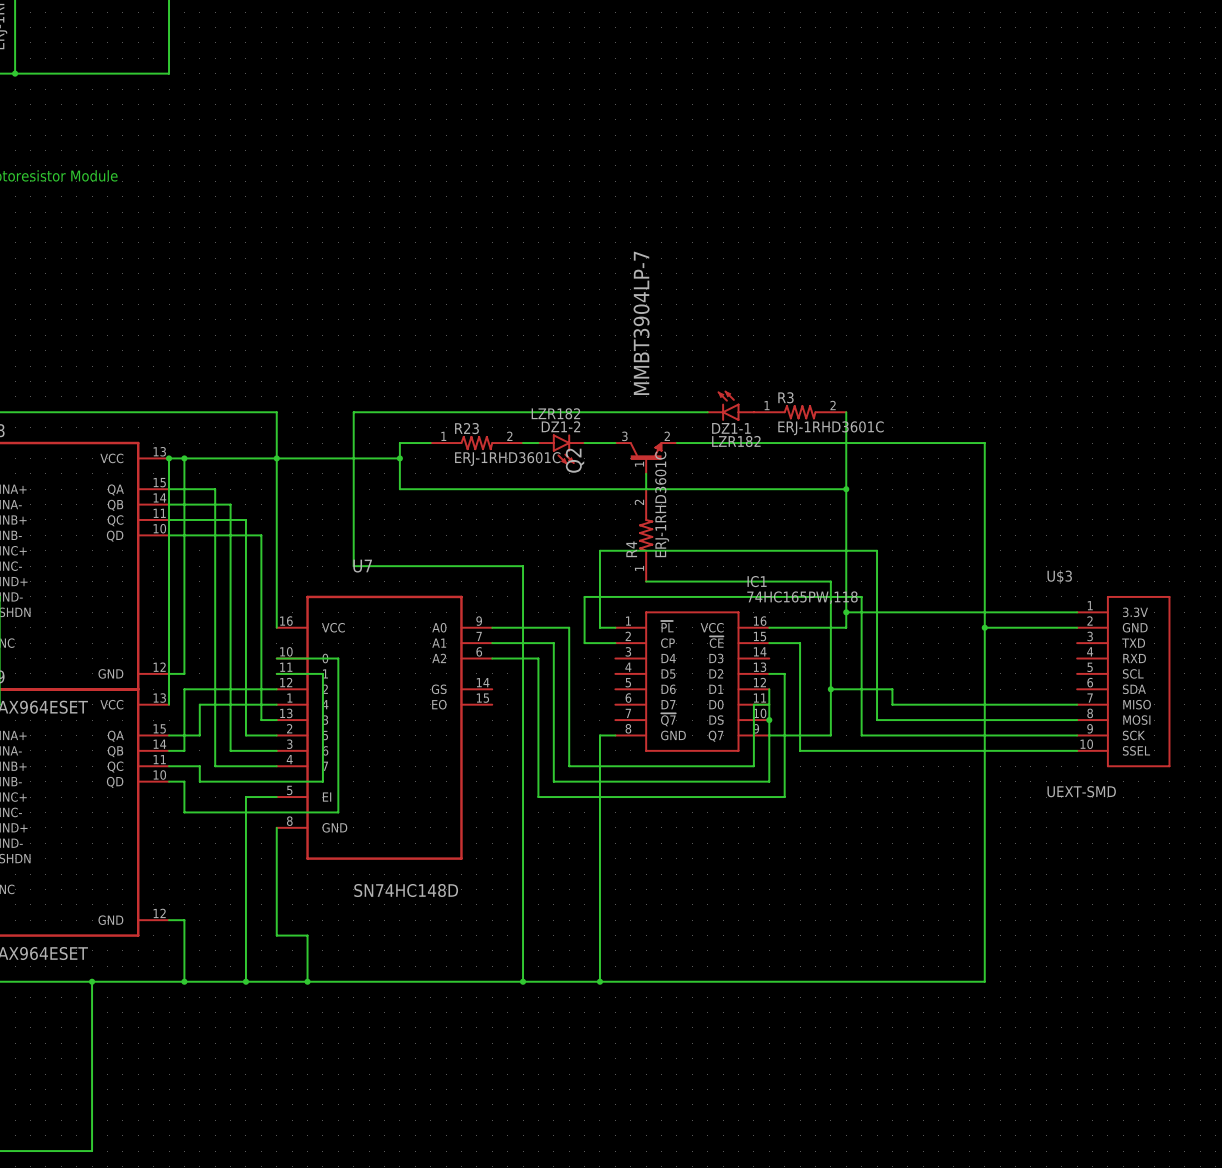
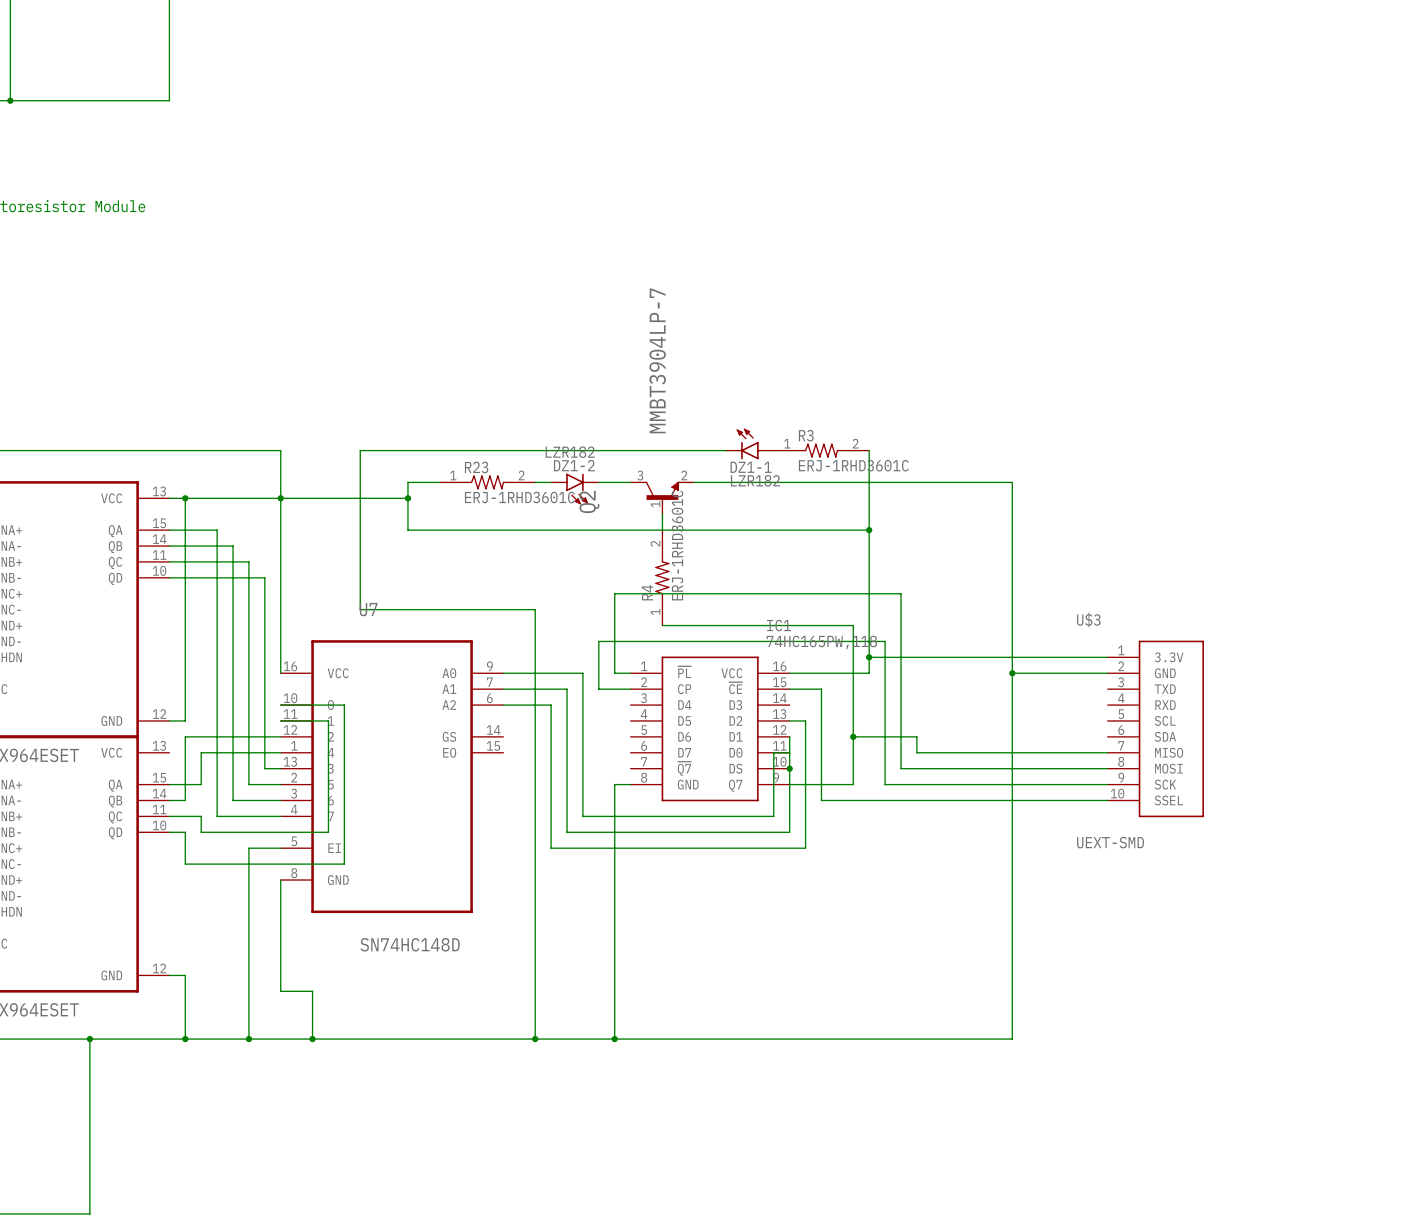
wire: (169, 458) (169, 704) -> none
junction: (169, 458) -> none

